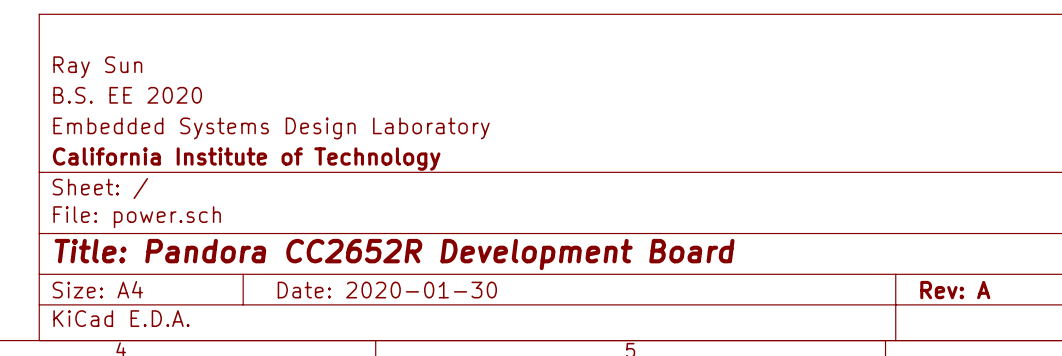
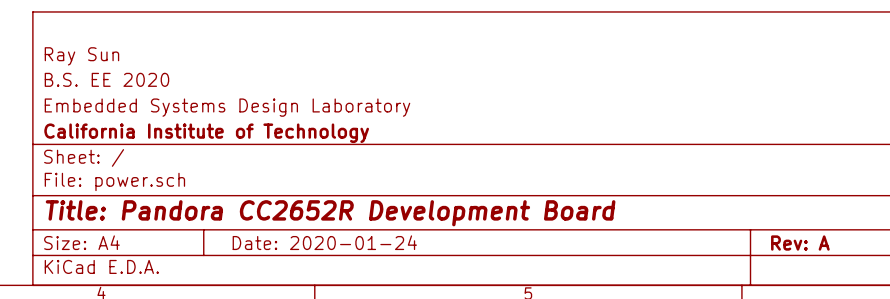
title block: Date: 2020-01-30 (387, 290) -> Date: 2020-01-24 (324, 242)

